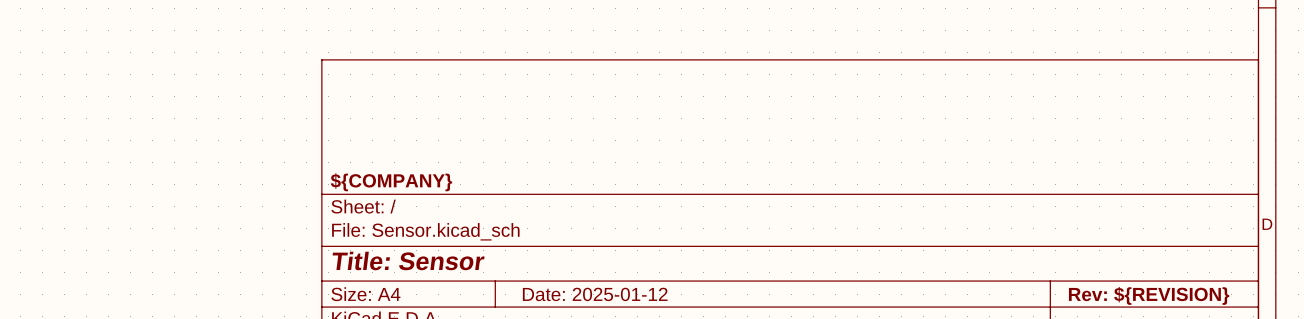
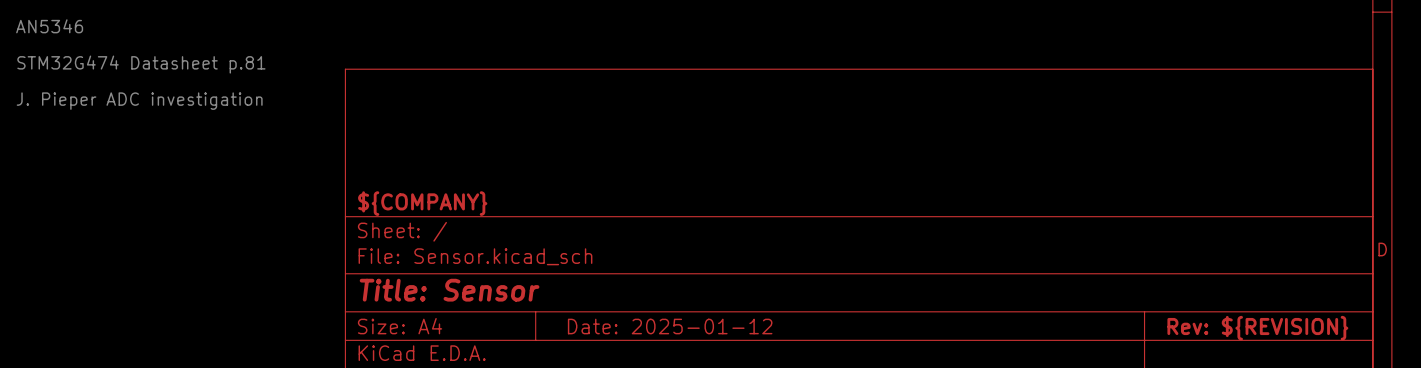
text: none -> AN5346 (49, 26)
text: none -> STM32G474 Datasheet p.81 (141, 64)
text: none -> J. Pieper ADC investigation (139, 101)

